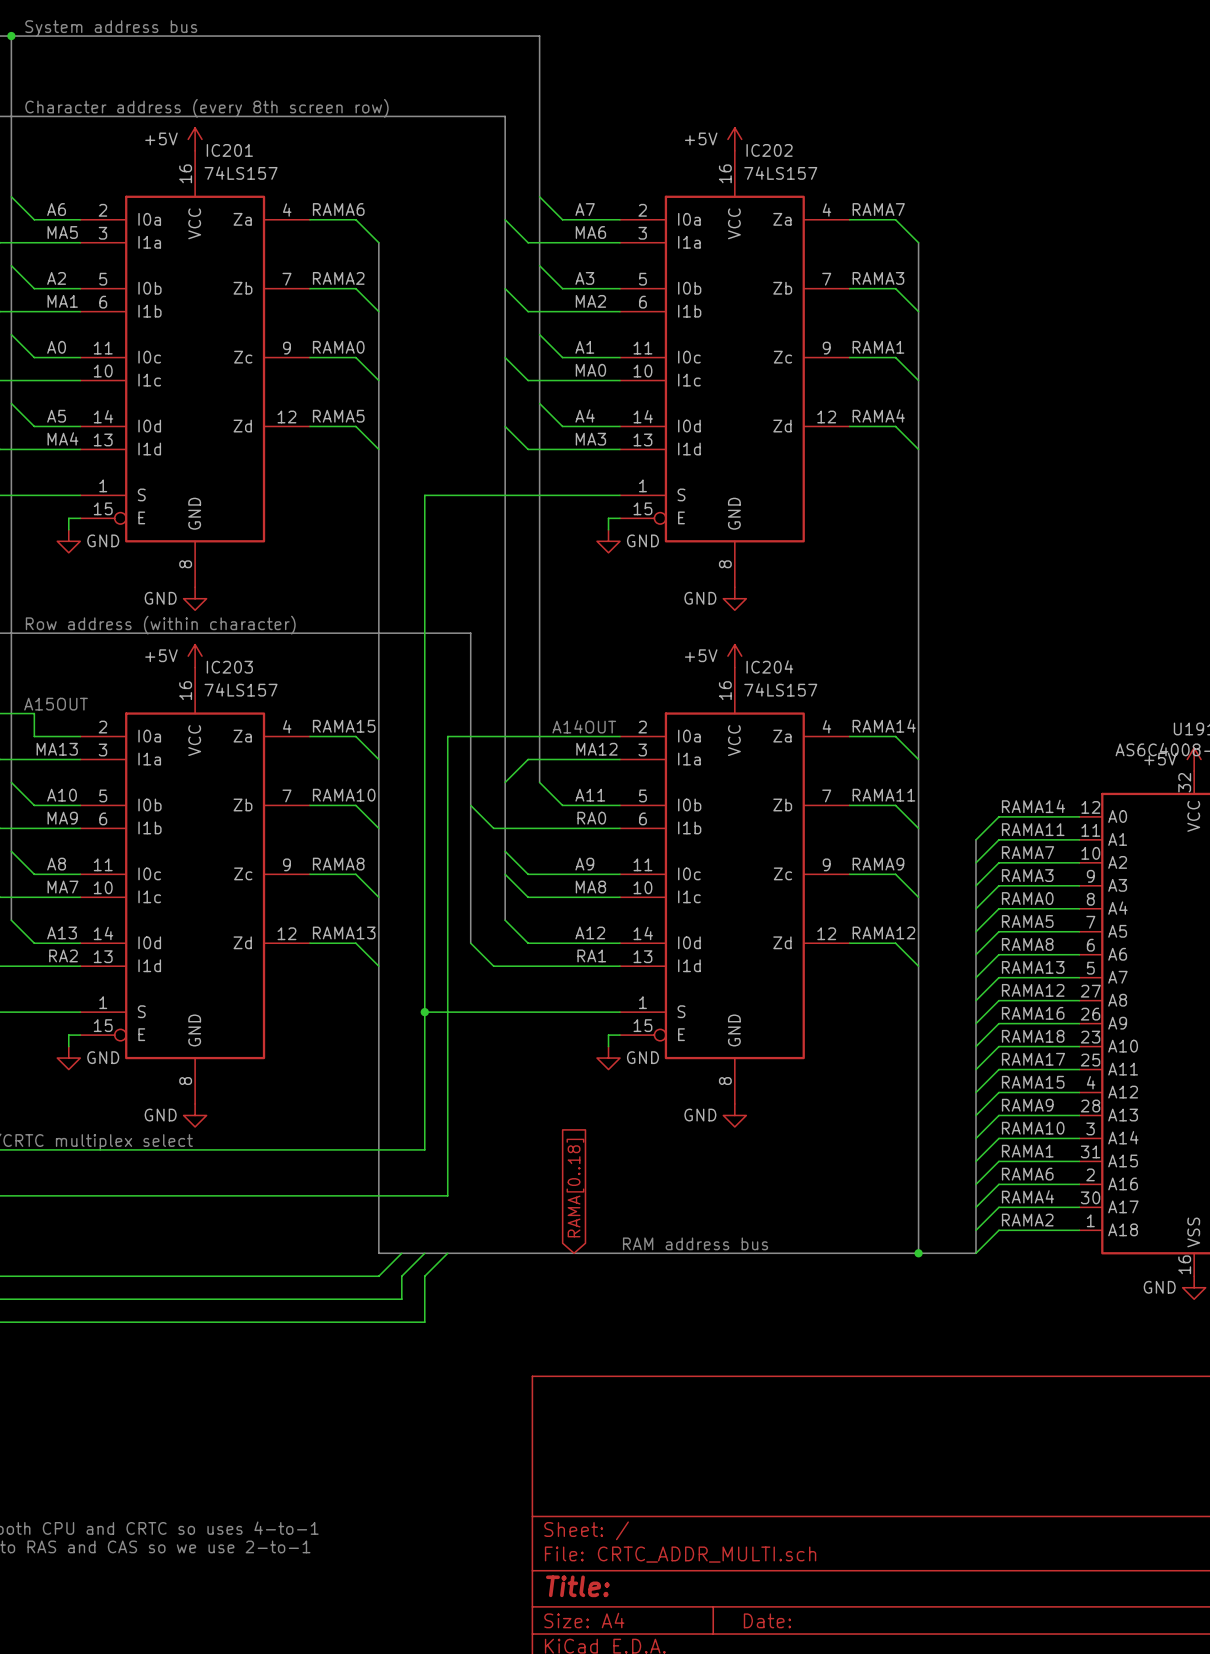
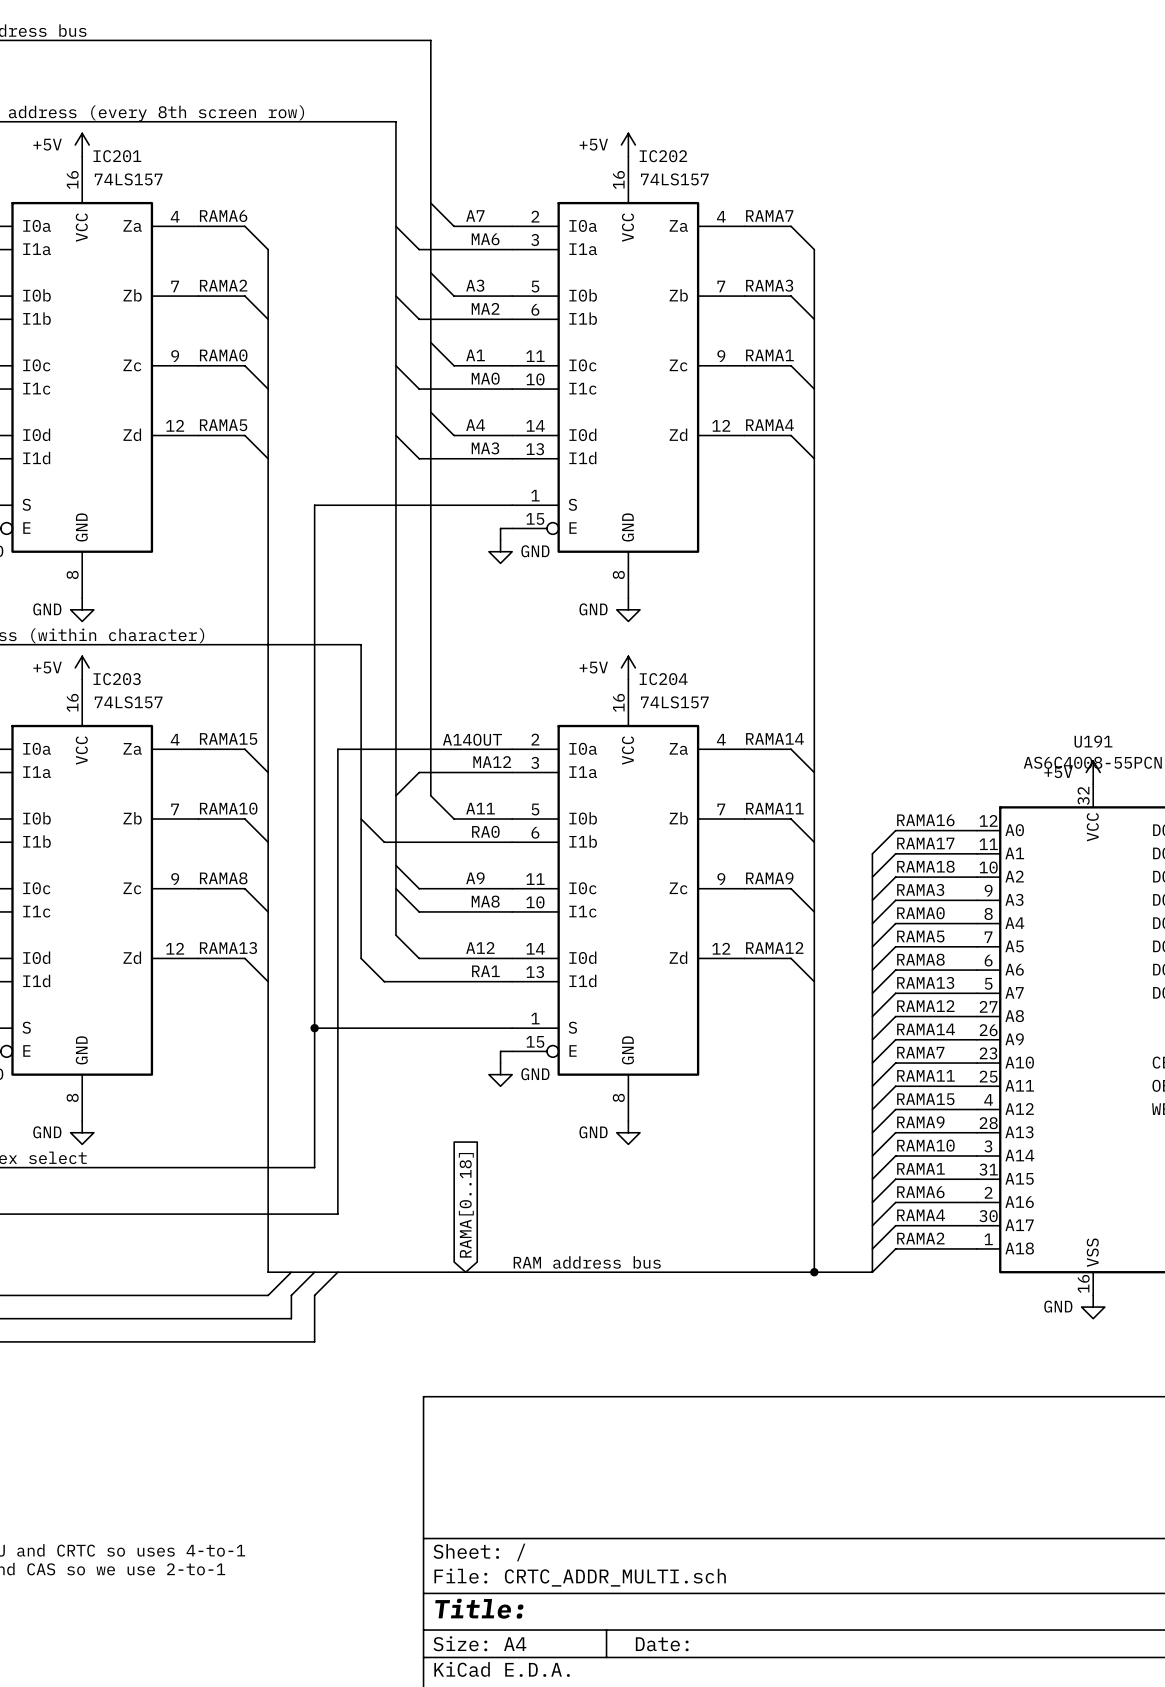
label: RAMA14 (1033, 806) -> RAMA16 (925, 820)
label: RAMA11 (1033, 829) -> RAMA17 (925, 843)
label: RAMA7 (1028, 852) -> RAMA18 (925, 866)
label: RAMA16 (1033, 1013) -> RAMA14 (926, 1029)
label: RAMA18 (1033, 1036) -> RAMA7 (920, 1052)
label: RAMA17 (1033, 1059) -> RAMA11 (925, 1075)

